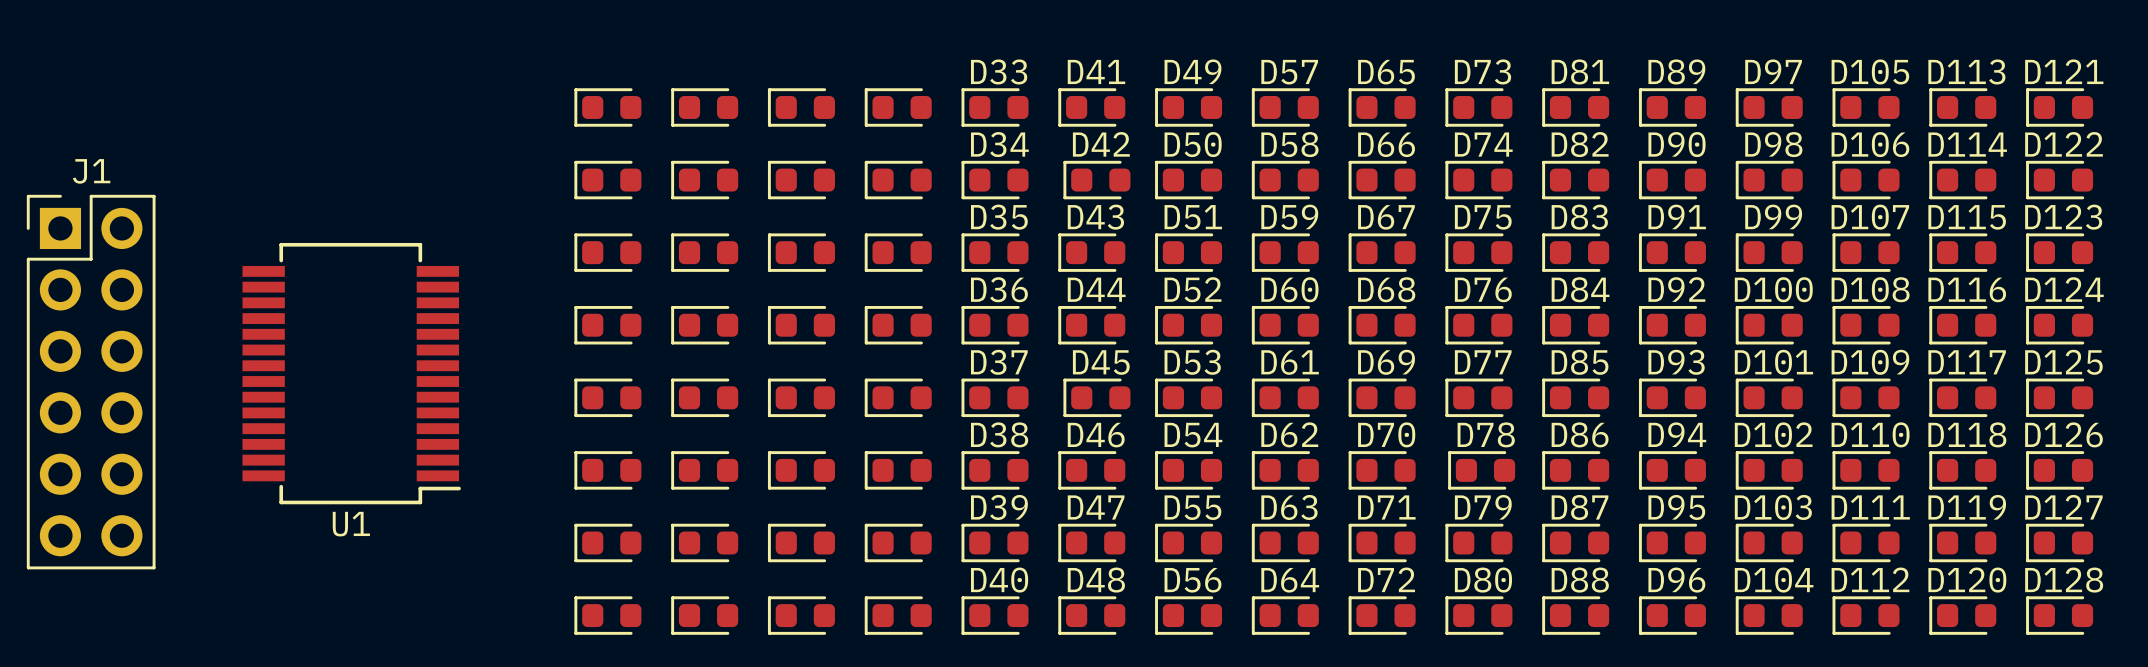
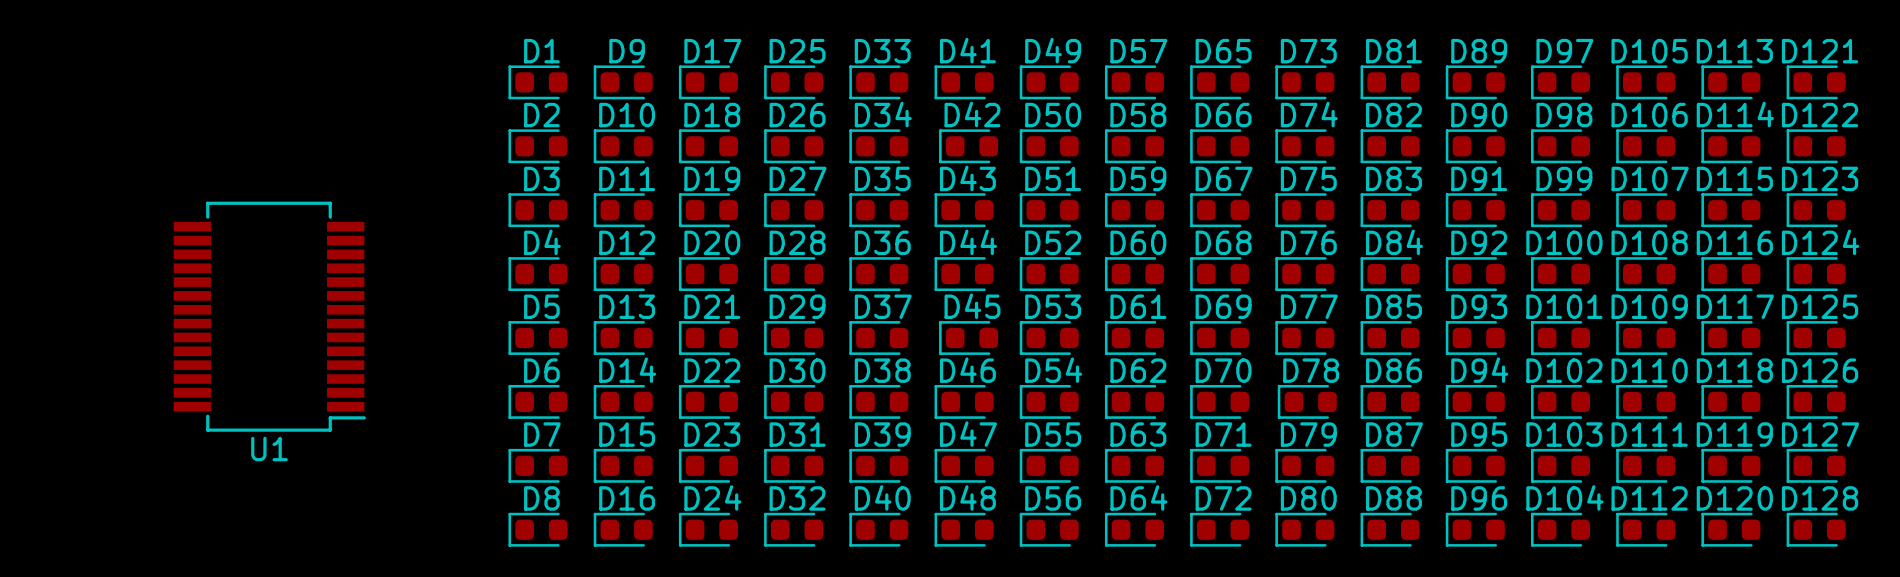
D1 name: none -> D1 (541, 51)
D9 name: none -> D9 (627, 51)
D17 name: none -> D17 (712, 51)
D25 name: none -> D25 (797, 51)
D2 name: none -> D2 (541, 115)
D10 name: none -> D10 (627, 115)
D18 name: none -> D18 (712, 115)
D26 name: none -> D26 (797, 115)
D19 name: none -> D19 (712, 178)
D27 name: none -> D27 (798, 178)
D3 name: none -> D3 (541, 178)
D11 name: none -> D11 (627, 178)
D4 name: none -> D4 (542, 242)
D12 name: none -> D12 (627, 242)
D20 name: none -> D20 (712, 242)
D28 name: none -> D28 (797, 242)
D5 name: none -> D5 (541, 306)
D13 name: none -> D13 (627, 306)
D21 name: none -> D21 (712, 306)
D29 name: none -> D29 (797, 306)
U1 position: (351, 373) -> (269, 316)
J1: (91, 382) -> none
D14 name: none -> D14 (627, 370)
D22 name: none -> D22 (712, 370)
D30 name: none -> D30 (797, 370)
D6 name: none -> D6 (541, 370)
D7 name: none -> D7 (542, 434)
D15 name: none -> D15 (627, 434)
D23 name: none -> D23 (712, 434)
D31 name: none -> D31 (797, 434)
D24 name: none -> D24 (712, 497)
D8 name: none -> D8 (541, 498)
D16 name: none -> D16 (627, 498)
D32 name: none -> D32 (797, 498)

